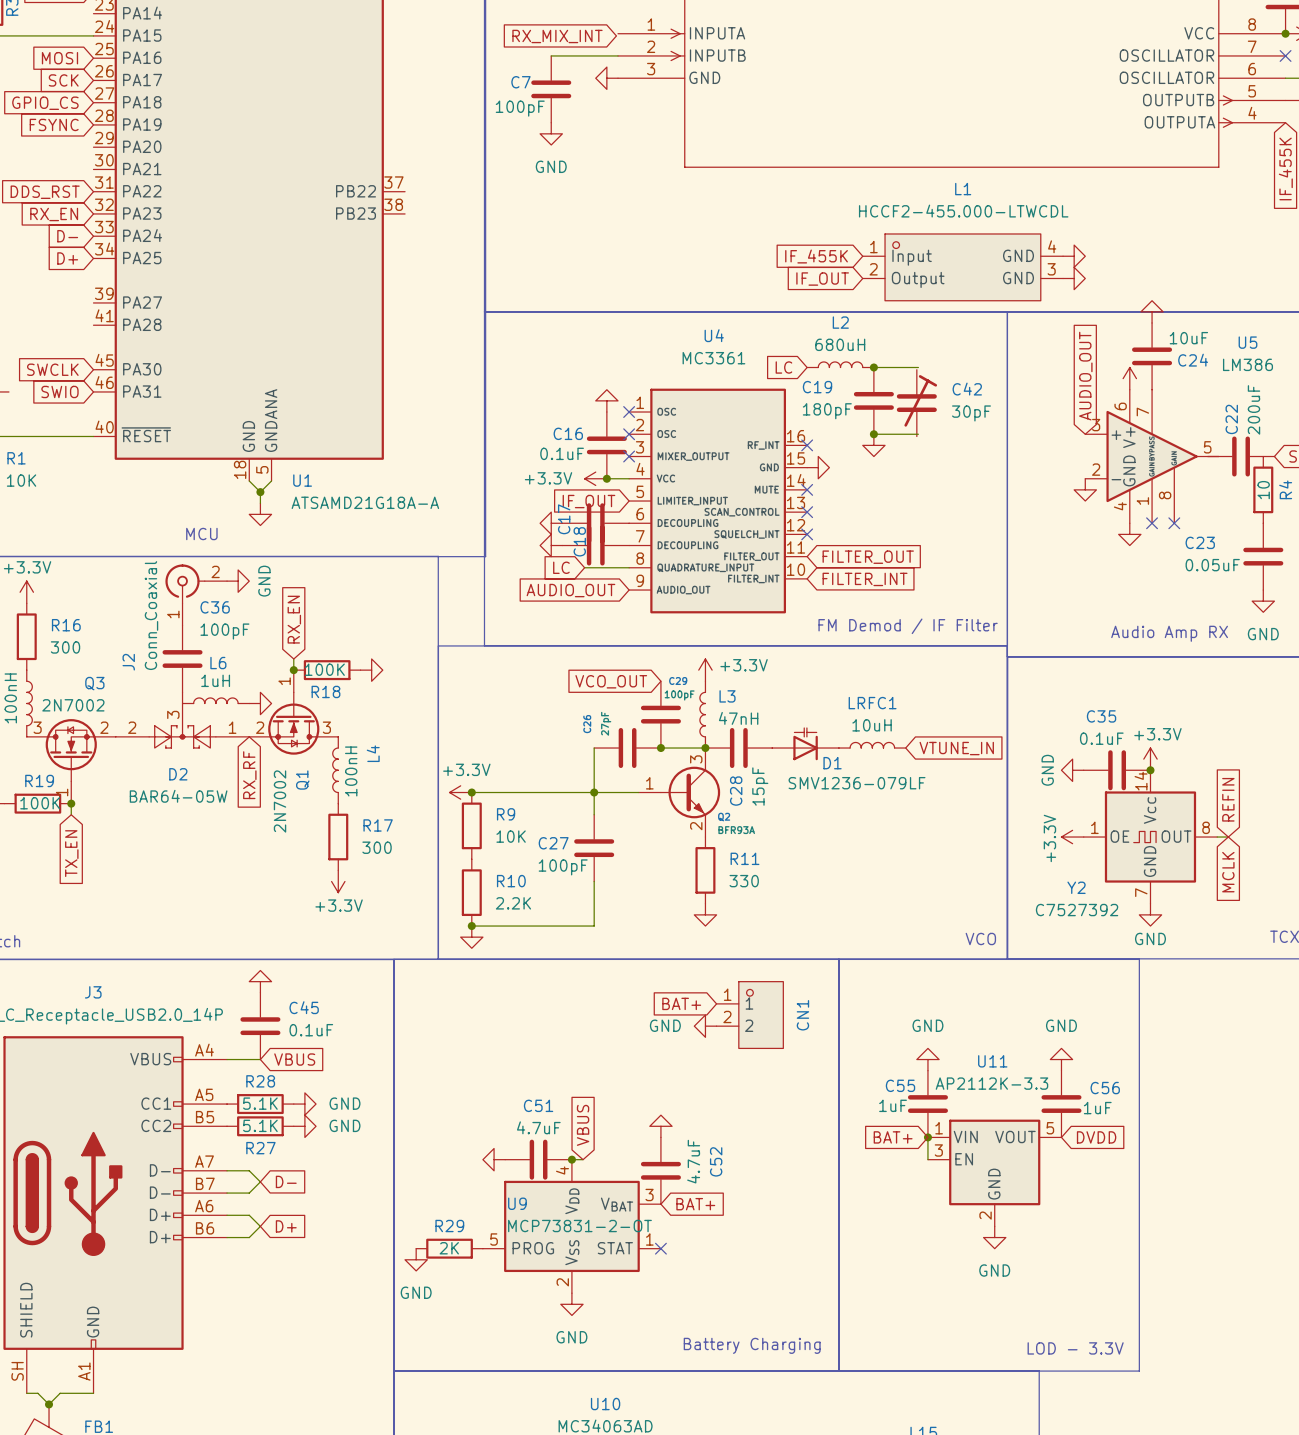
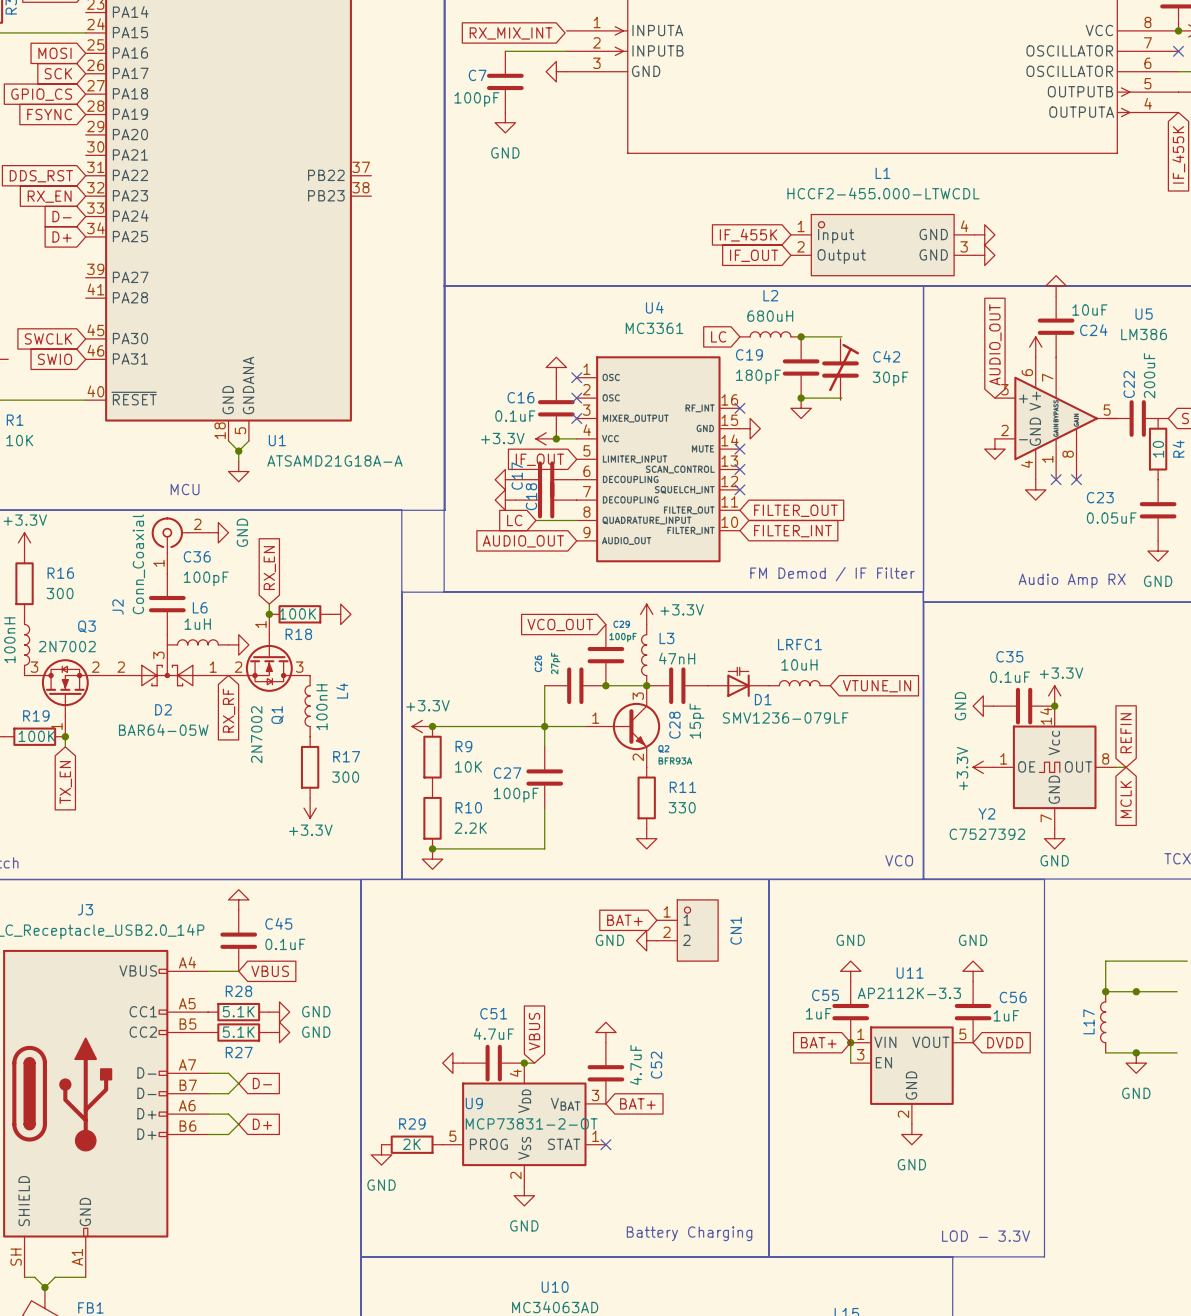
wire: none -> (1187, 961) (1105, 961) (1105, 991) (1177, 991)
junction: none -> (1105, 991)
junction: none -> (1136, 991)
L17: none -> (1103, 1022)
wire: none -> (1105, 1052) (1177, 1052)
junction: none -> (1136, 1052)
power symbol: none -> GND (1136, 1063)

